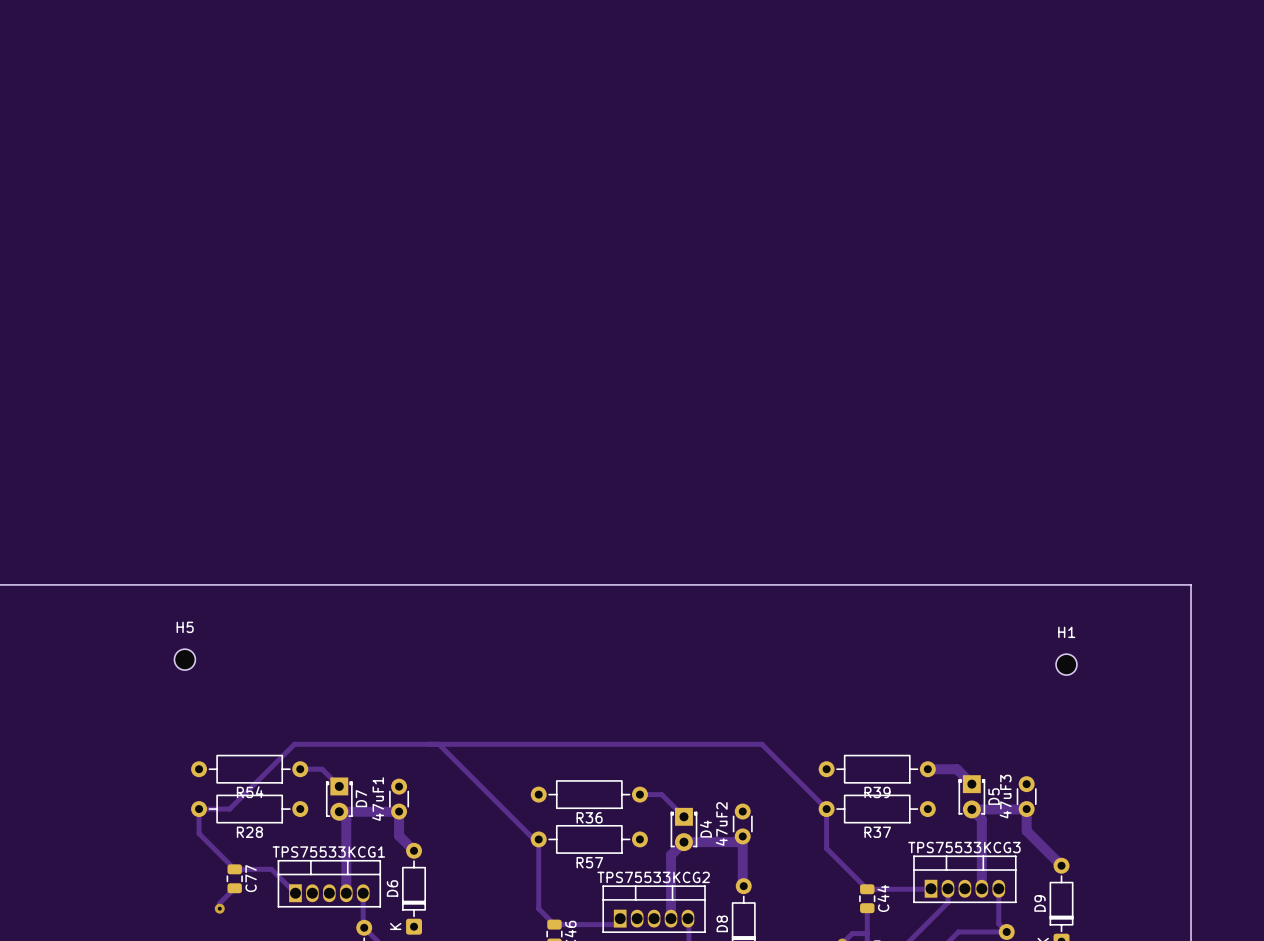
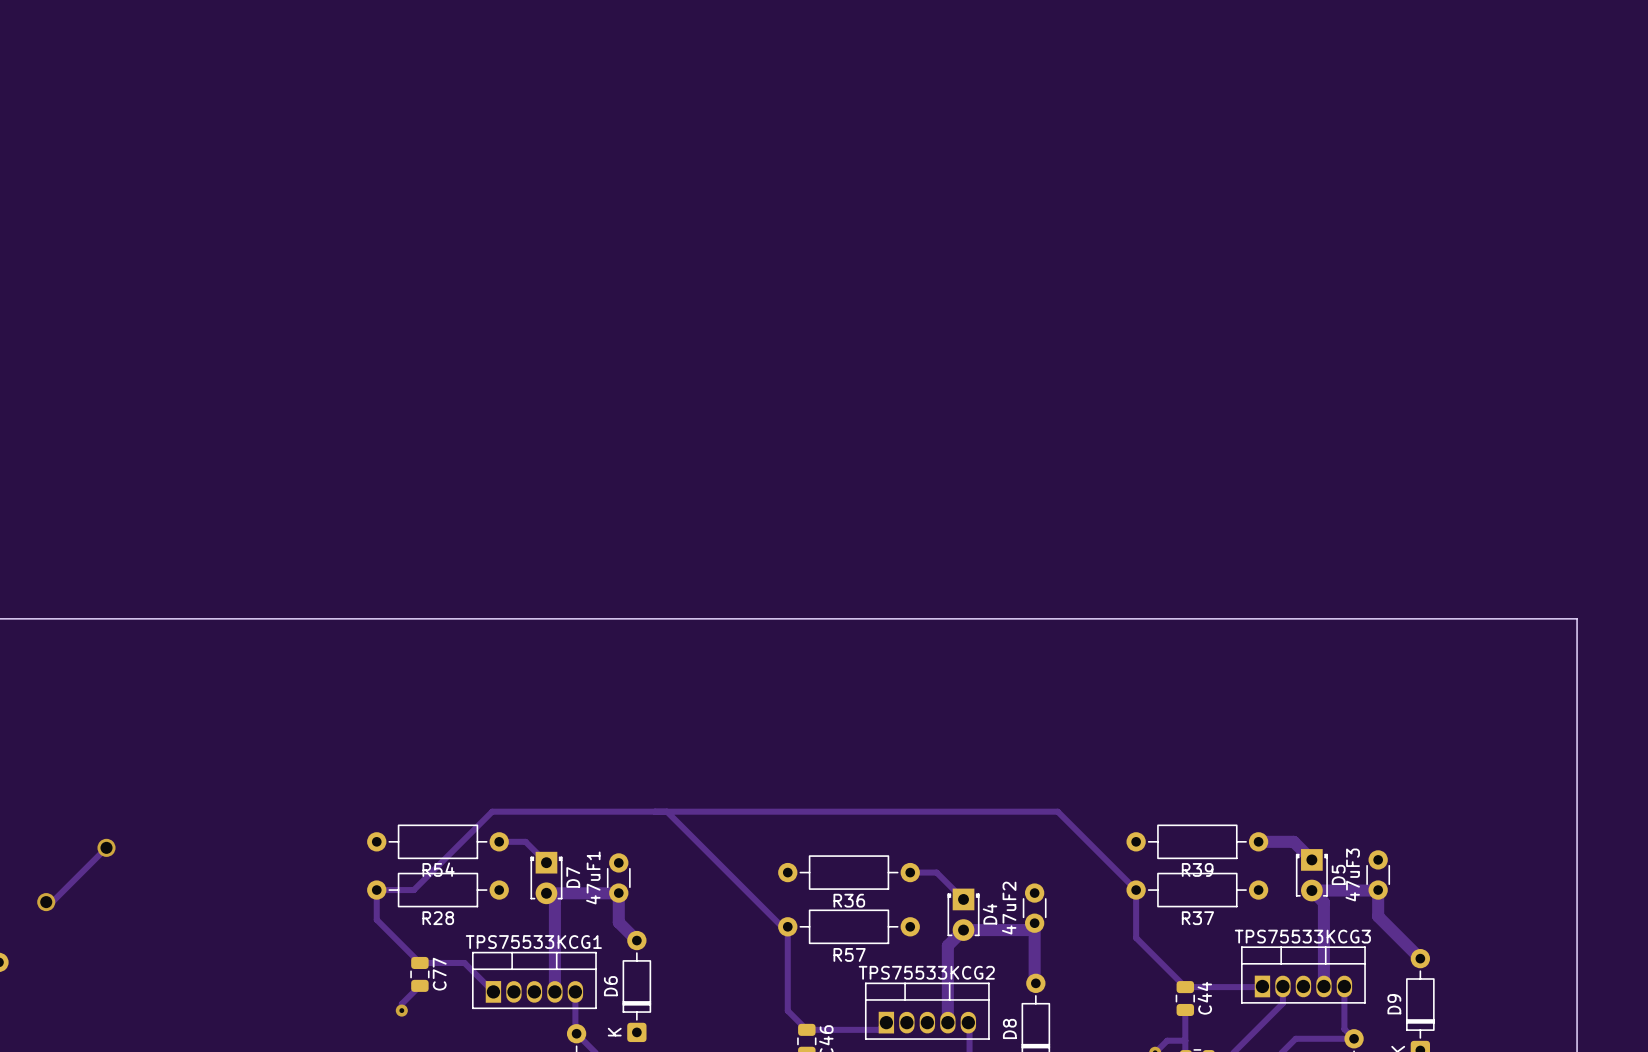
H5: (184, 659) -> none
H1: (1066, 664) -> none

